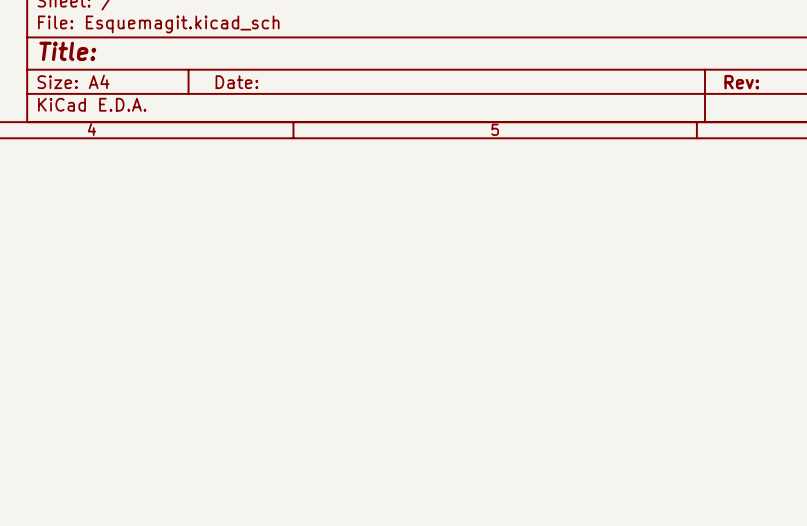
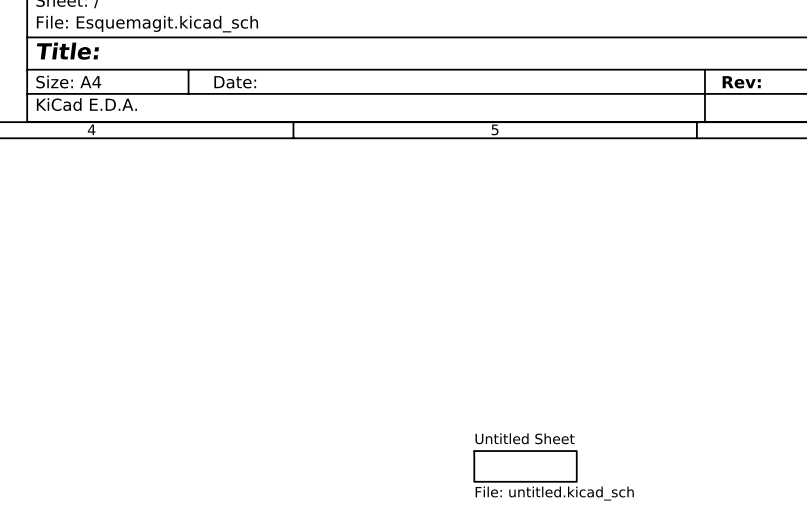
sheet Untitled Sheet: none -> File: untitled.kicad_sch (525, 466)

